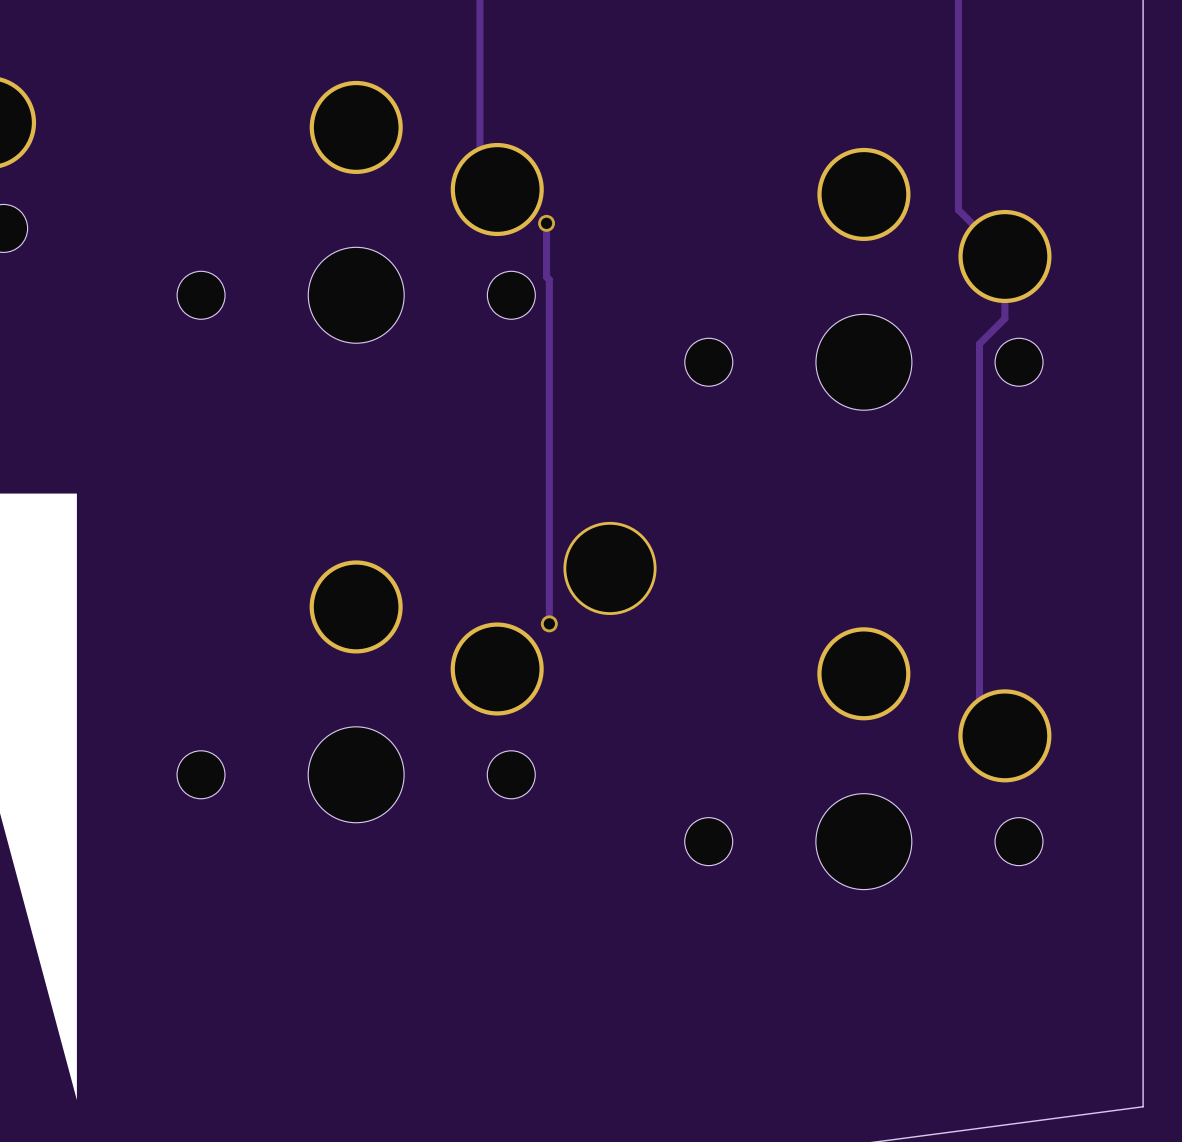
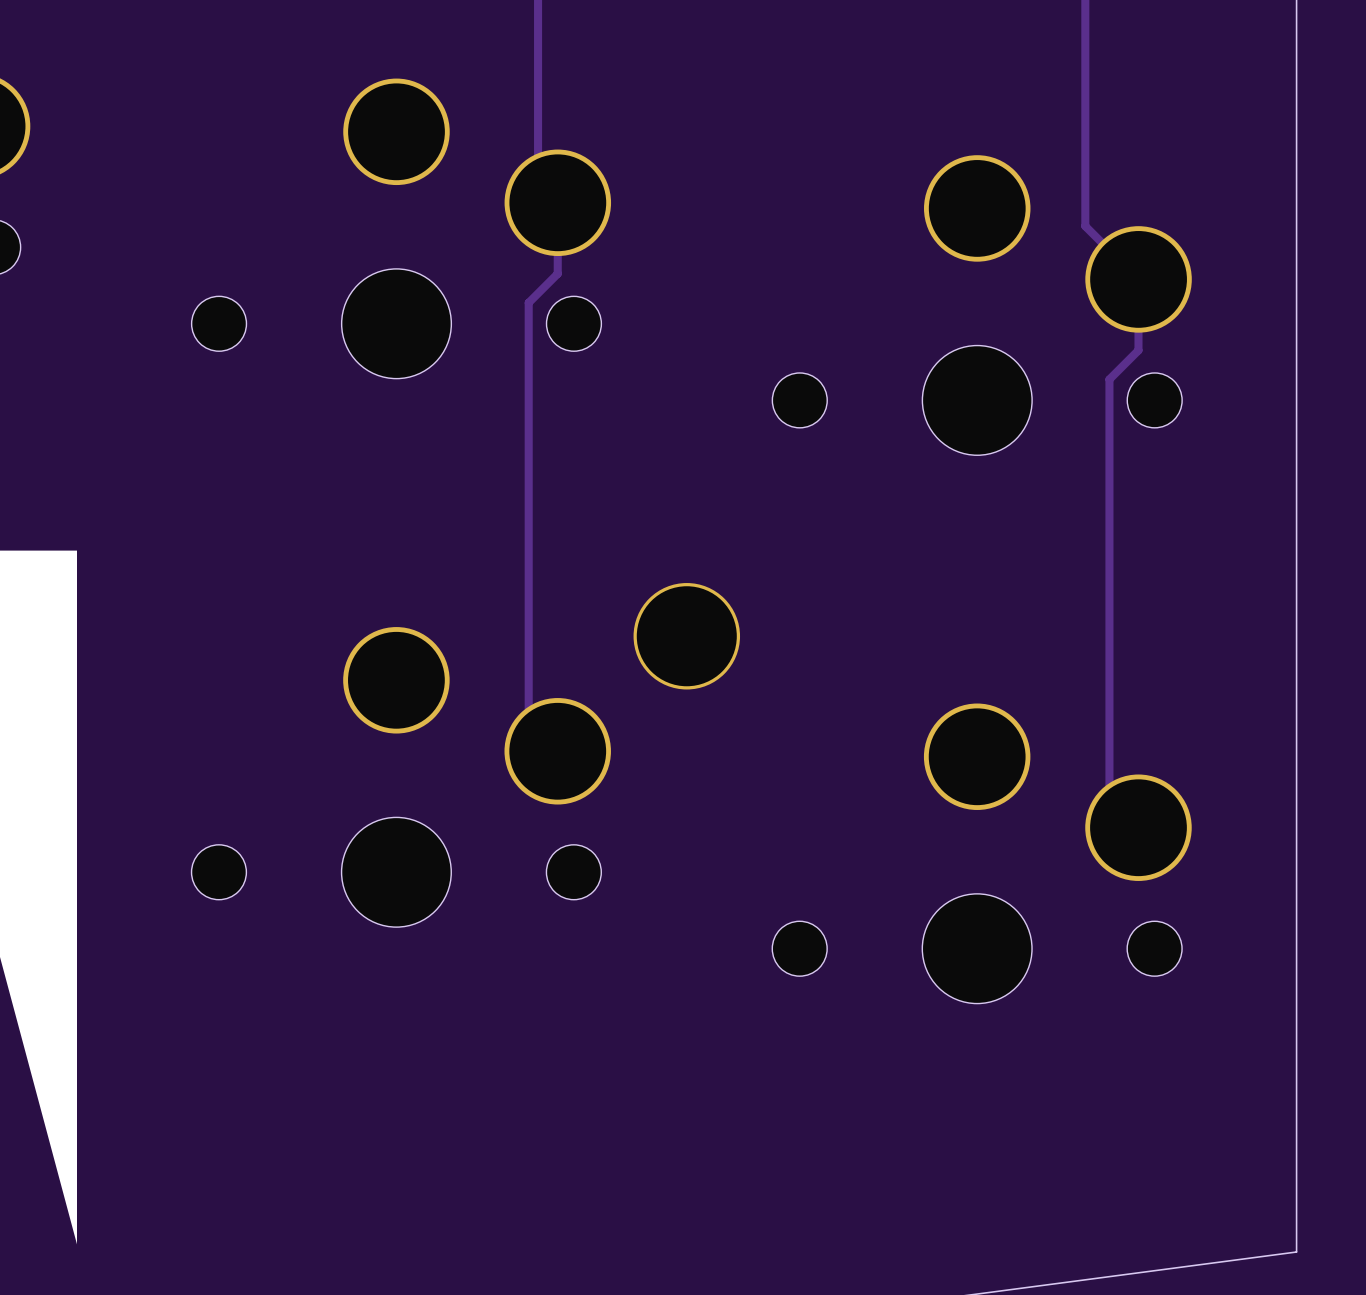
track: none -> (557, 202) (557, 273) (528, 302) (528, 709)
track: (546, 223) (546, 276) (549, 279) (549, 623) -> none
via: (546, 223) -> none
via: (549, 623) -> none

